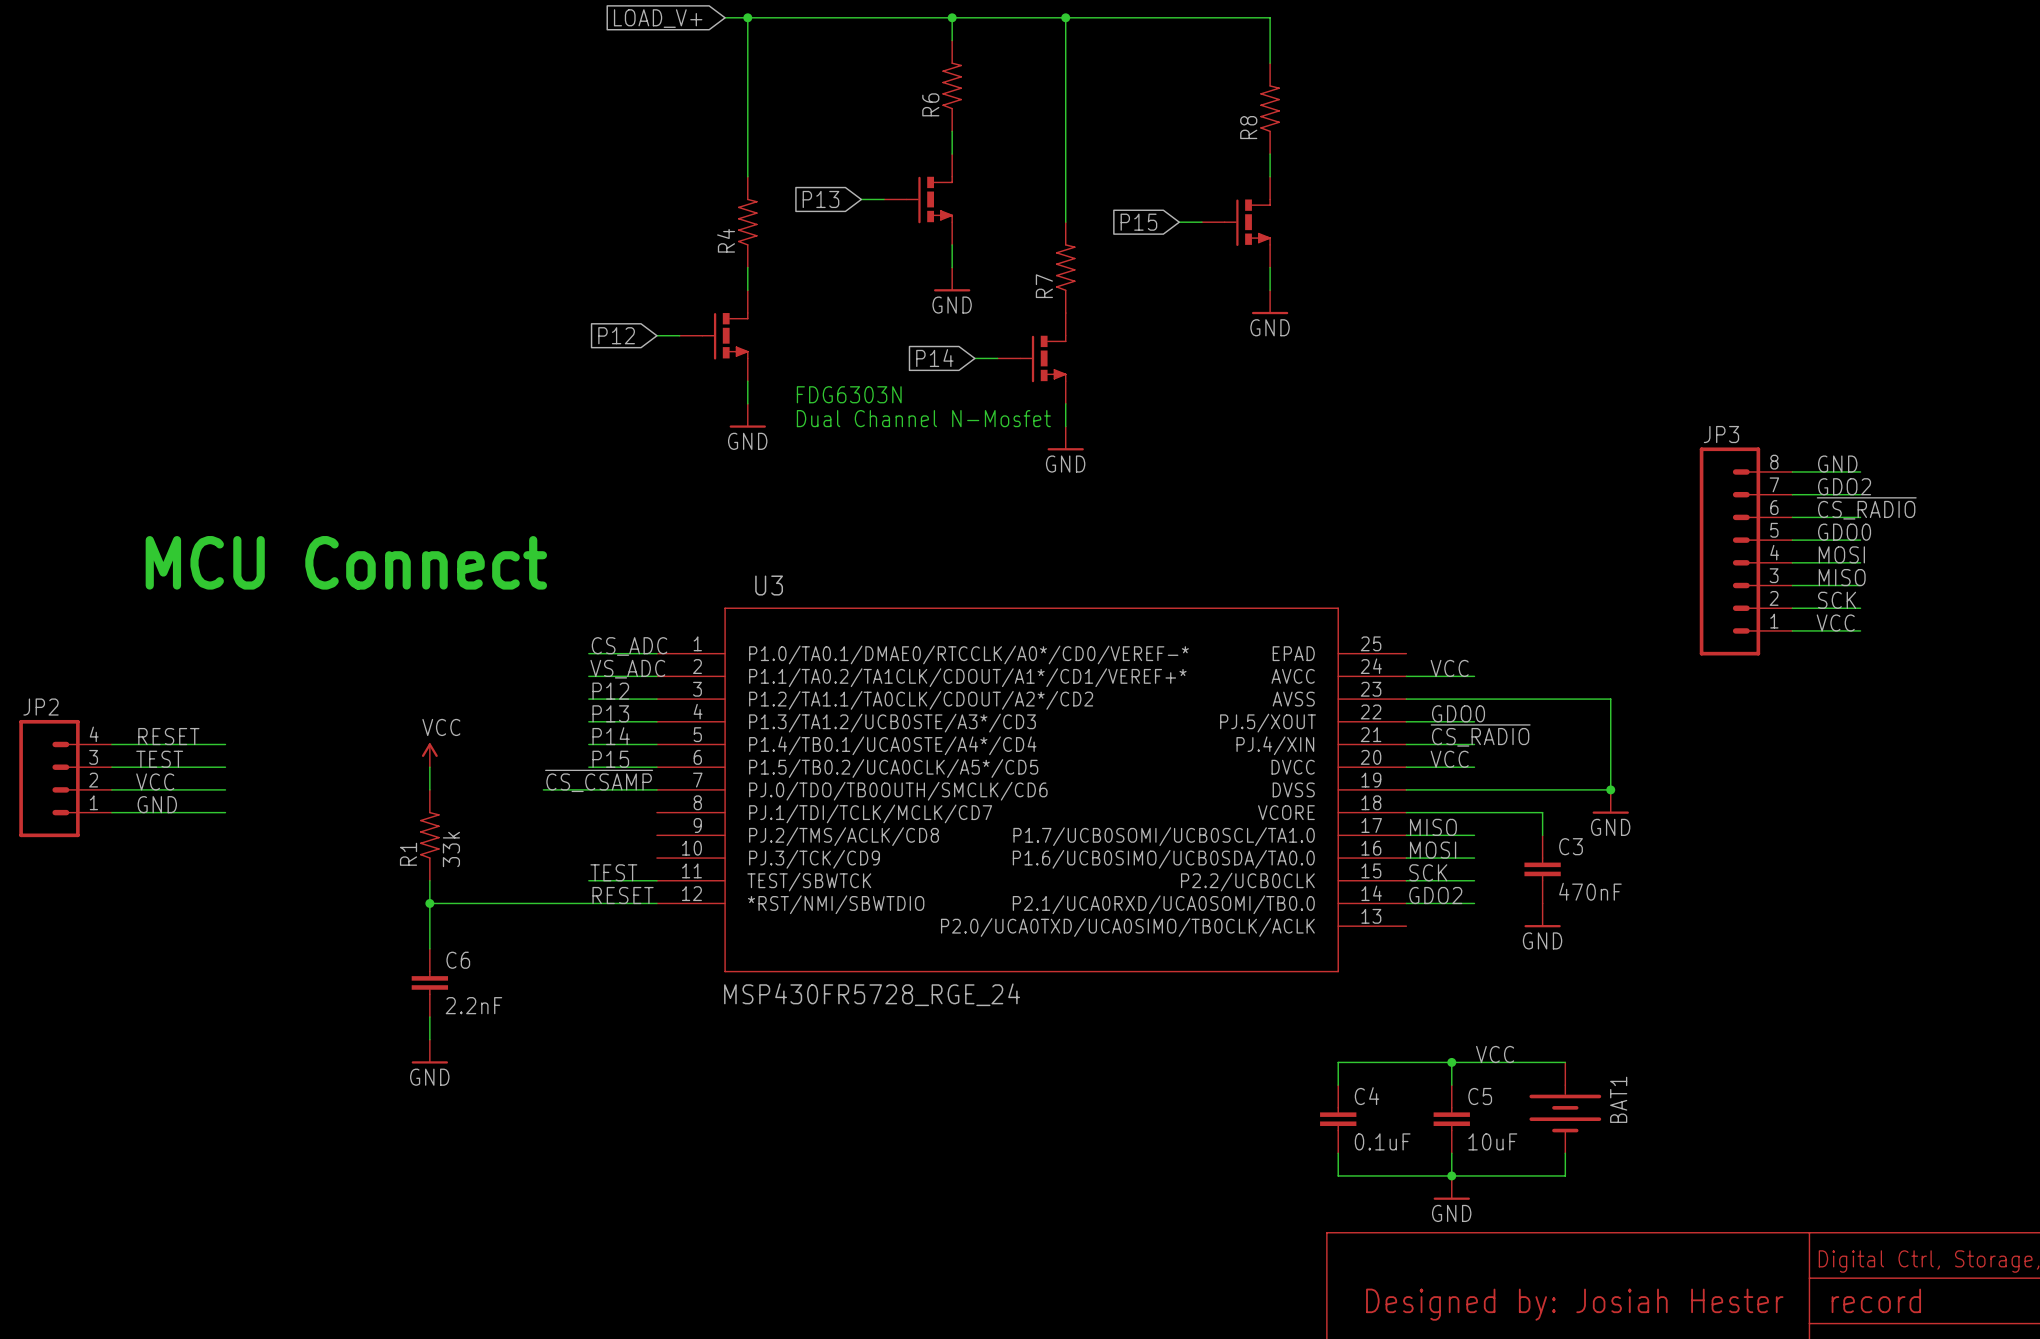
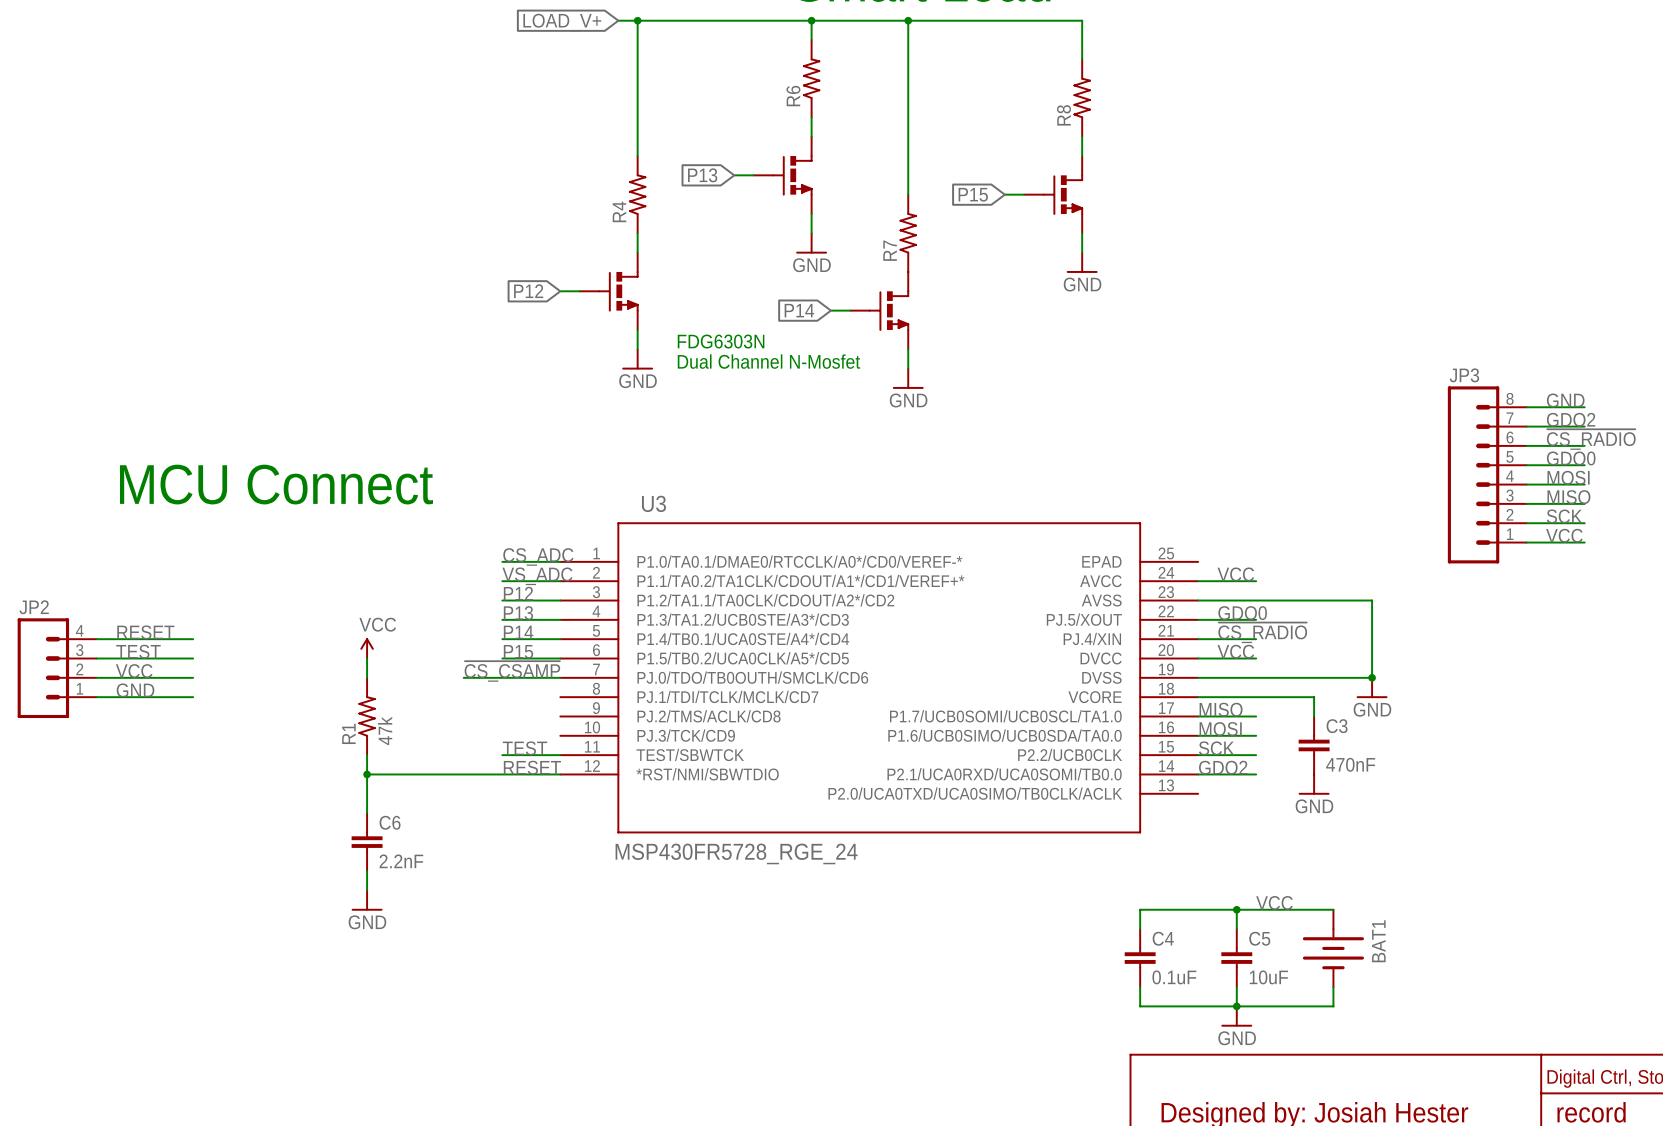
R1 value: 33k (451, 849) -> 47k (385, 730)

